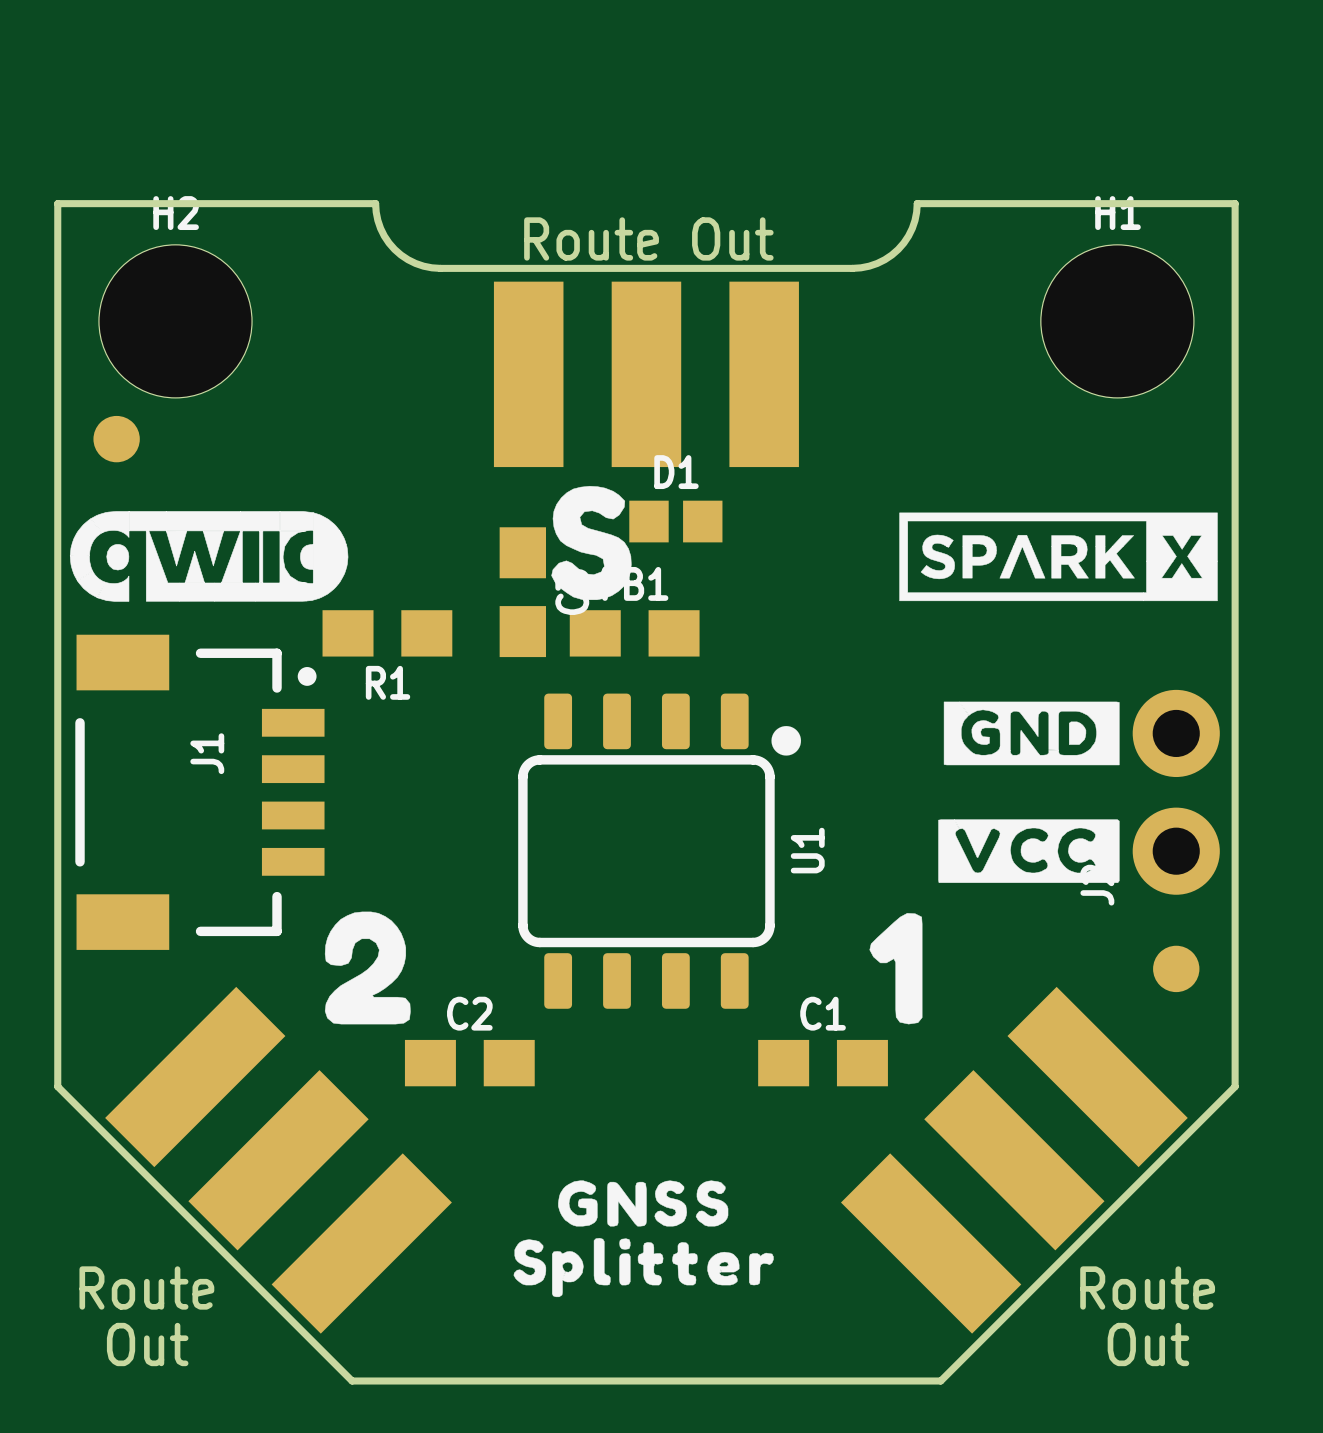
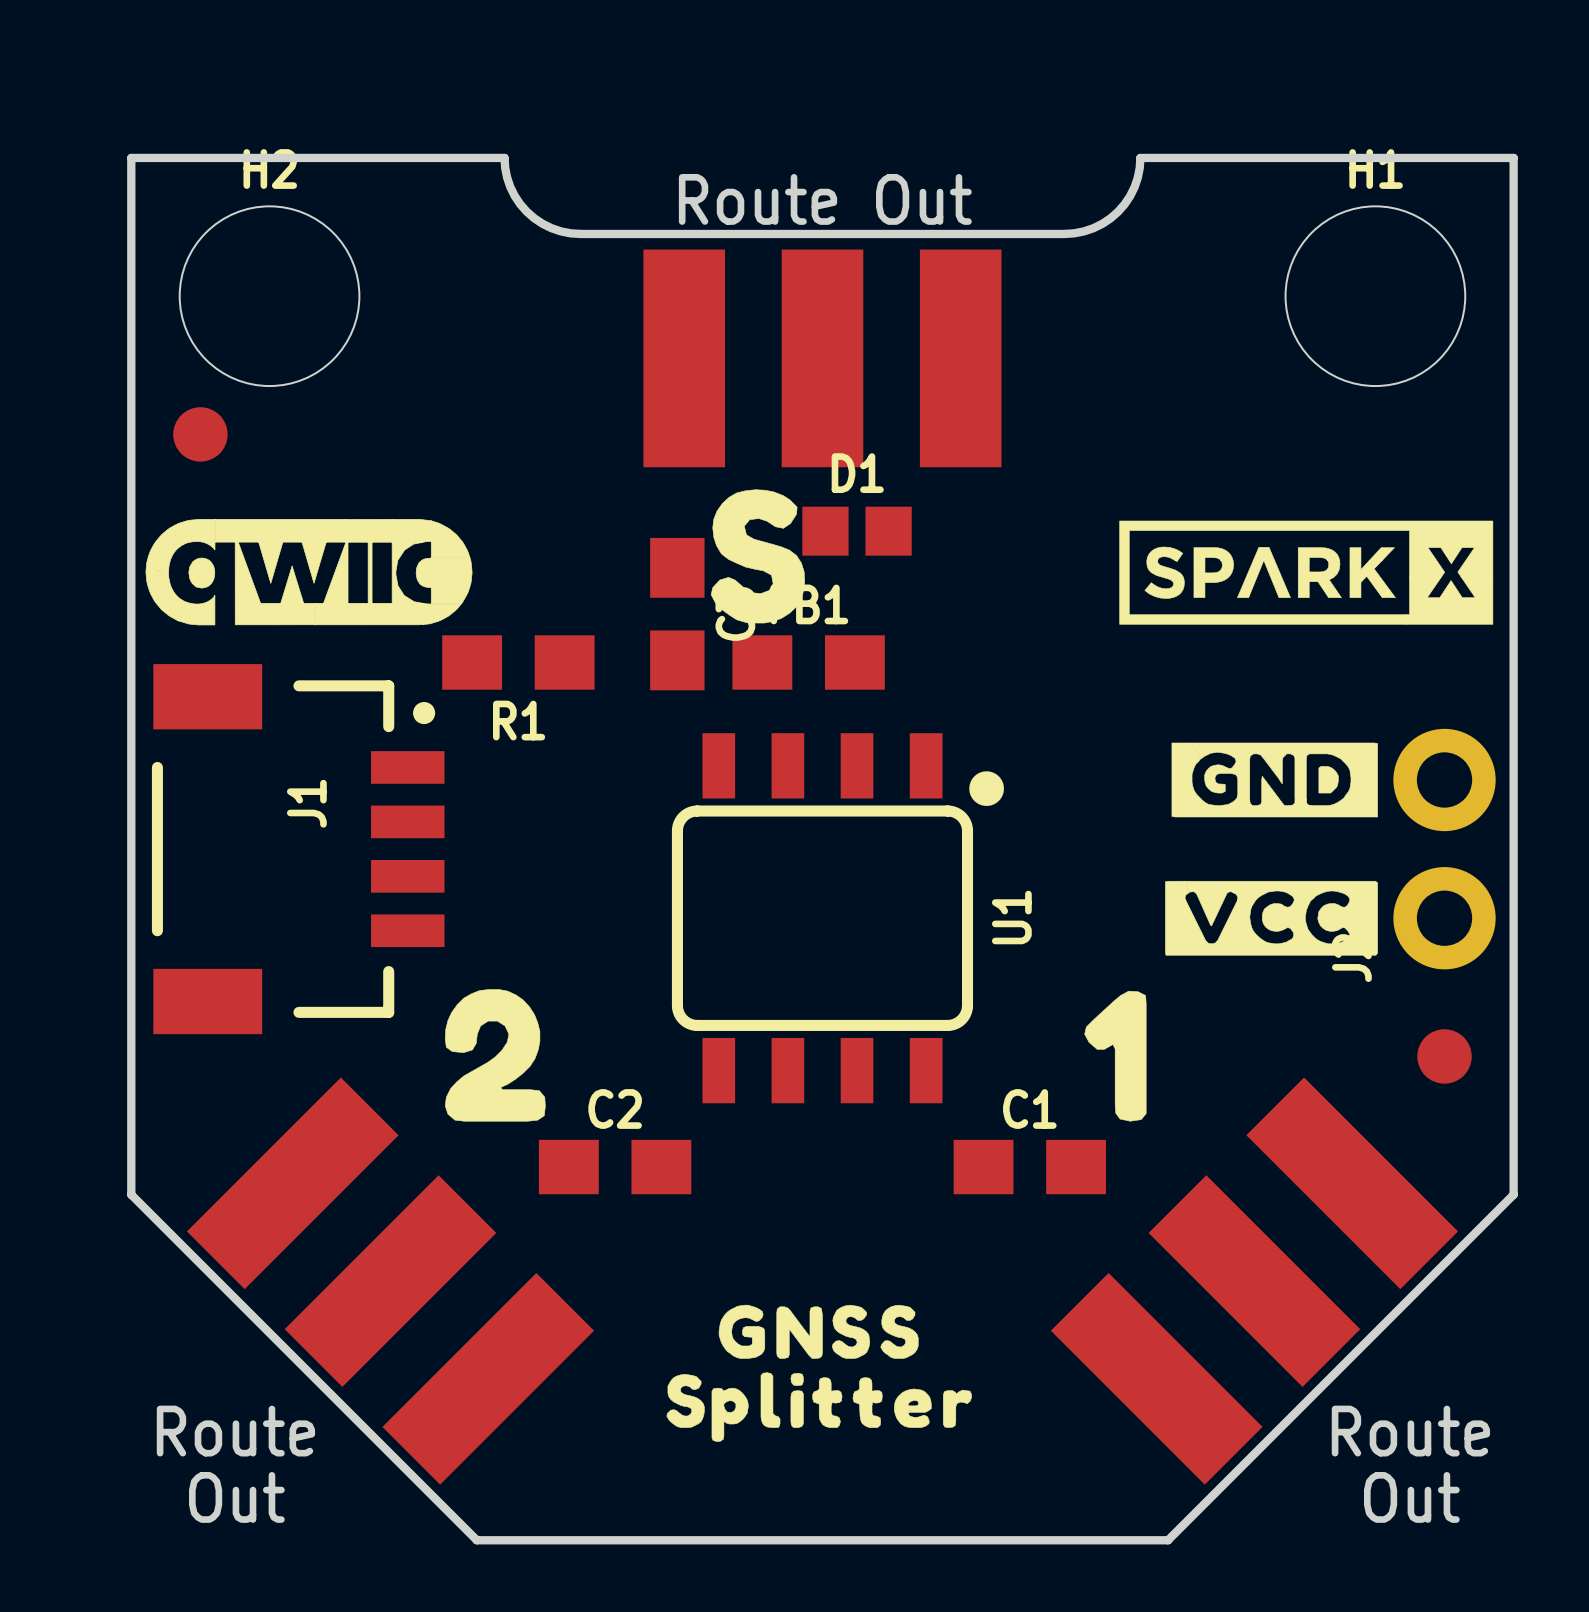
U1 footprint: [518, 693, 802, 1009] -> [671, 733, 1004, 1104]

